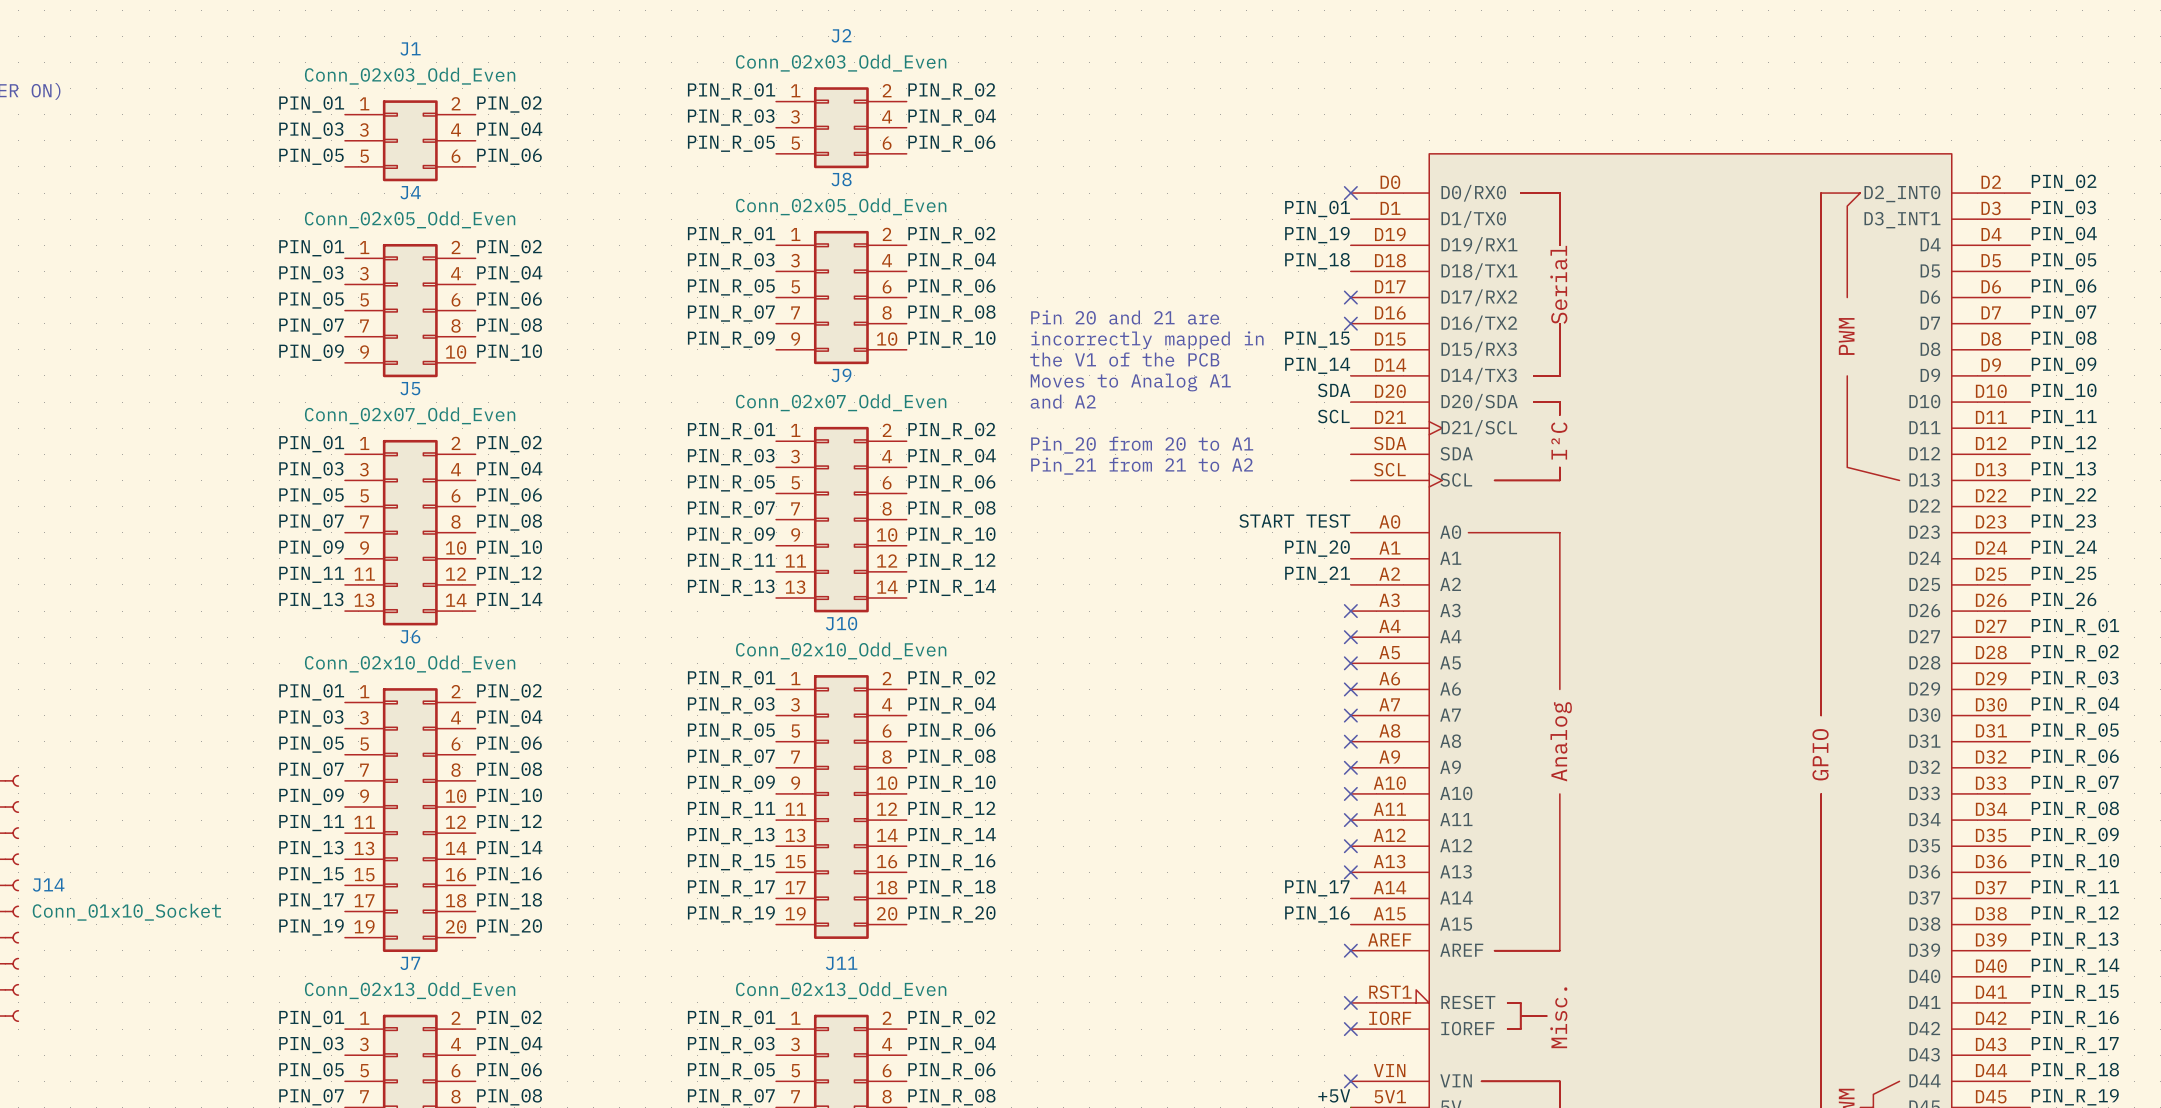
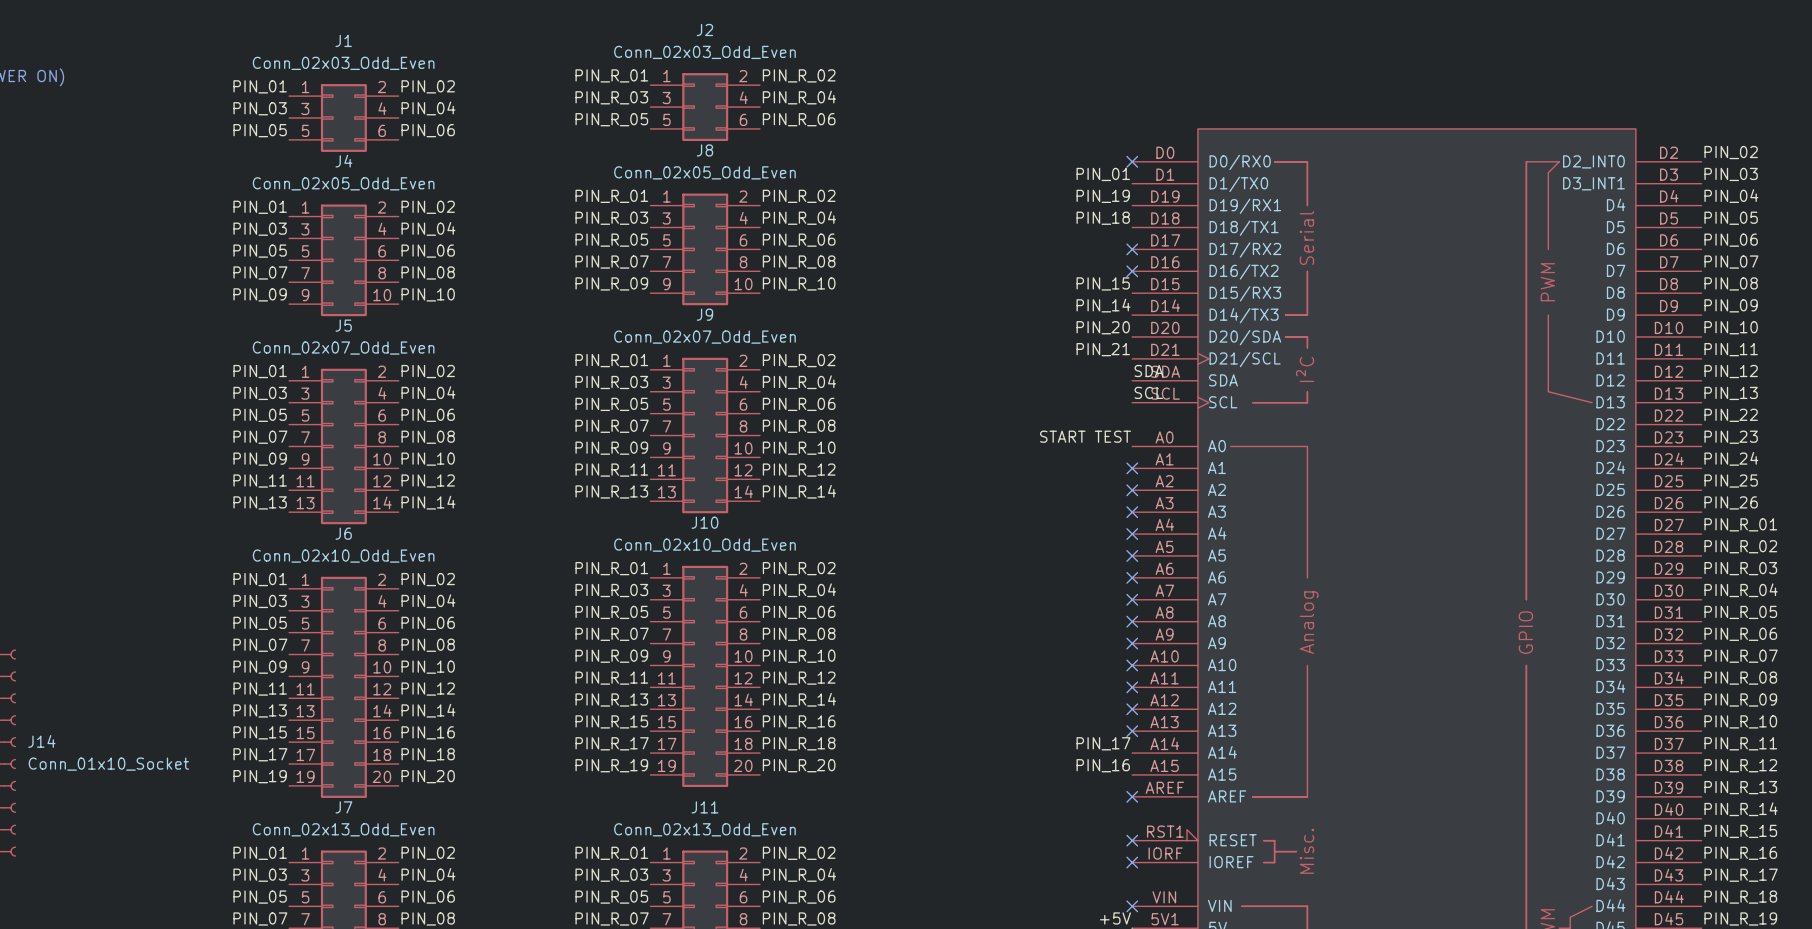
text: Pin 20 and 21 are (1125, 317) -> none
text: incorrectly mapped in (1147, 340) -> none
text: the V1 of the PCB (1124, 359) -> none
text: Moves to Analog A1 (1130, 382) -> none
label: SDA (1334, 390) -> PIN_20 (1103, 327)
text: and A2 (1063, 401) -> none
label: SCL (1333, 416) -> PIN_21 (1103, 349)
label: none -> SDA (1149, 371)
text: Pin_20 from 20 to A1 (1142, 445) -> none
text: Pin_21 from 21 to A2 (1142, 466) -> none
label: none -> SCL (1148, 392)
label: PIN_20 (1317, 548) -> none
no-connect mark: none -> (1132, 468)
label: PIN_21 (1317, 574) -> none
no-connect mark: none -> (1132, 490)

